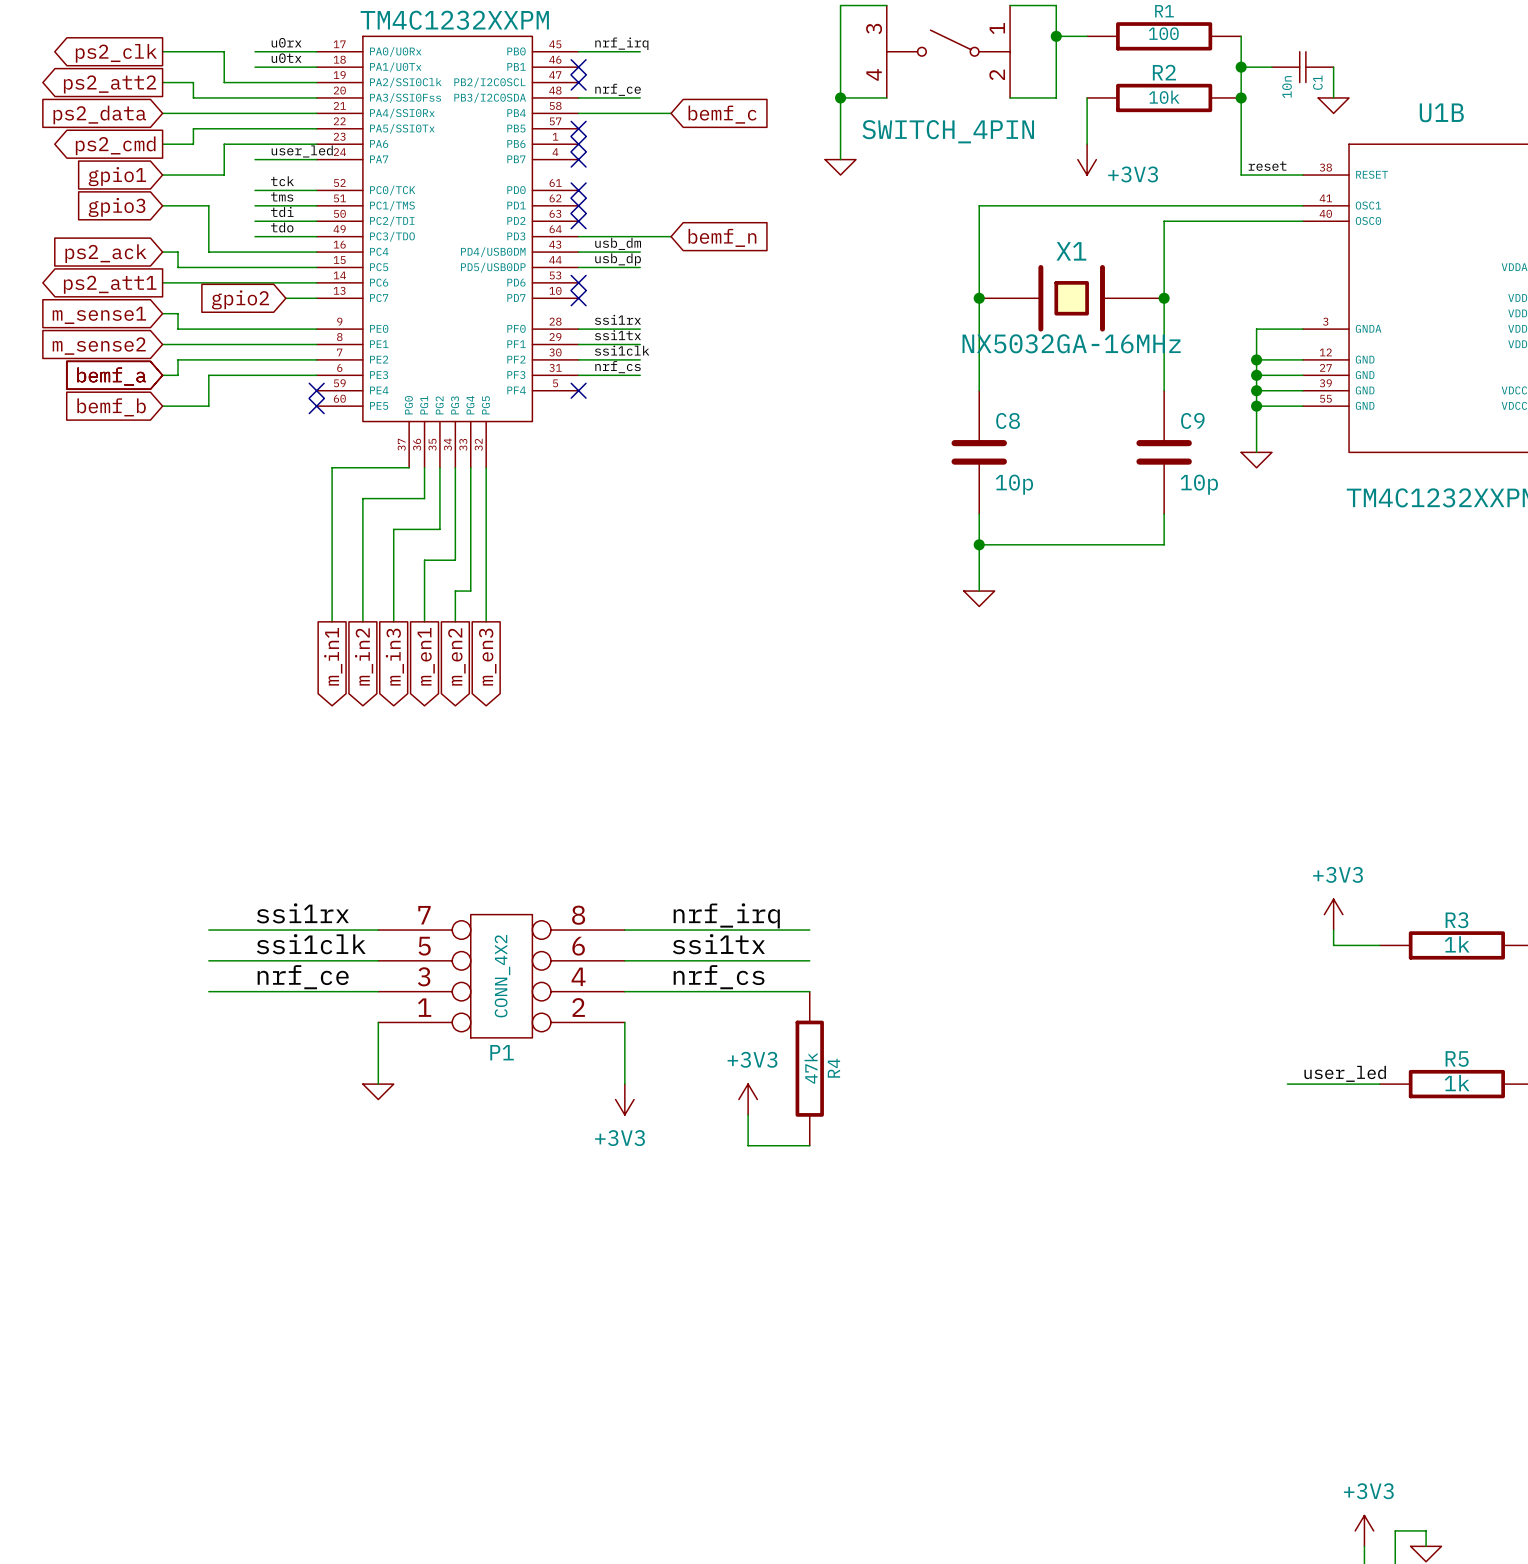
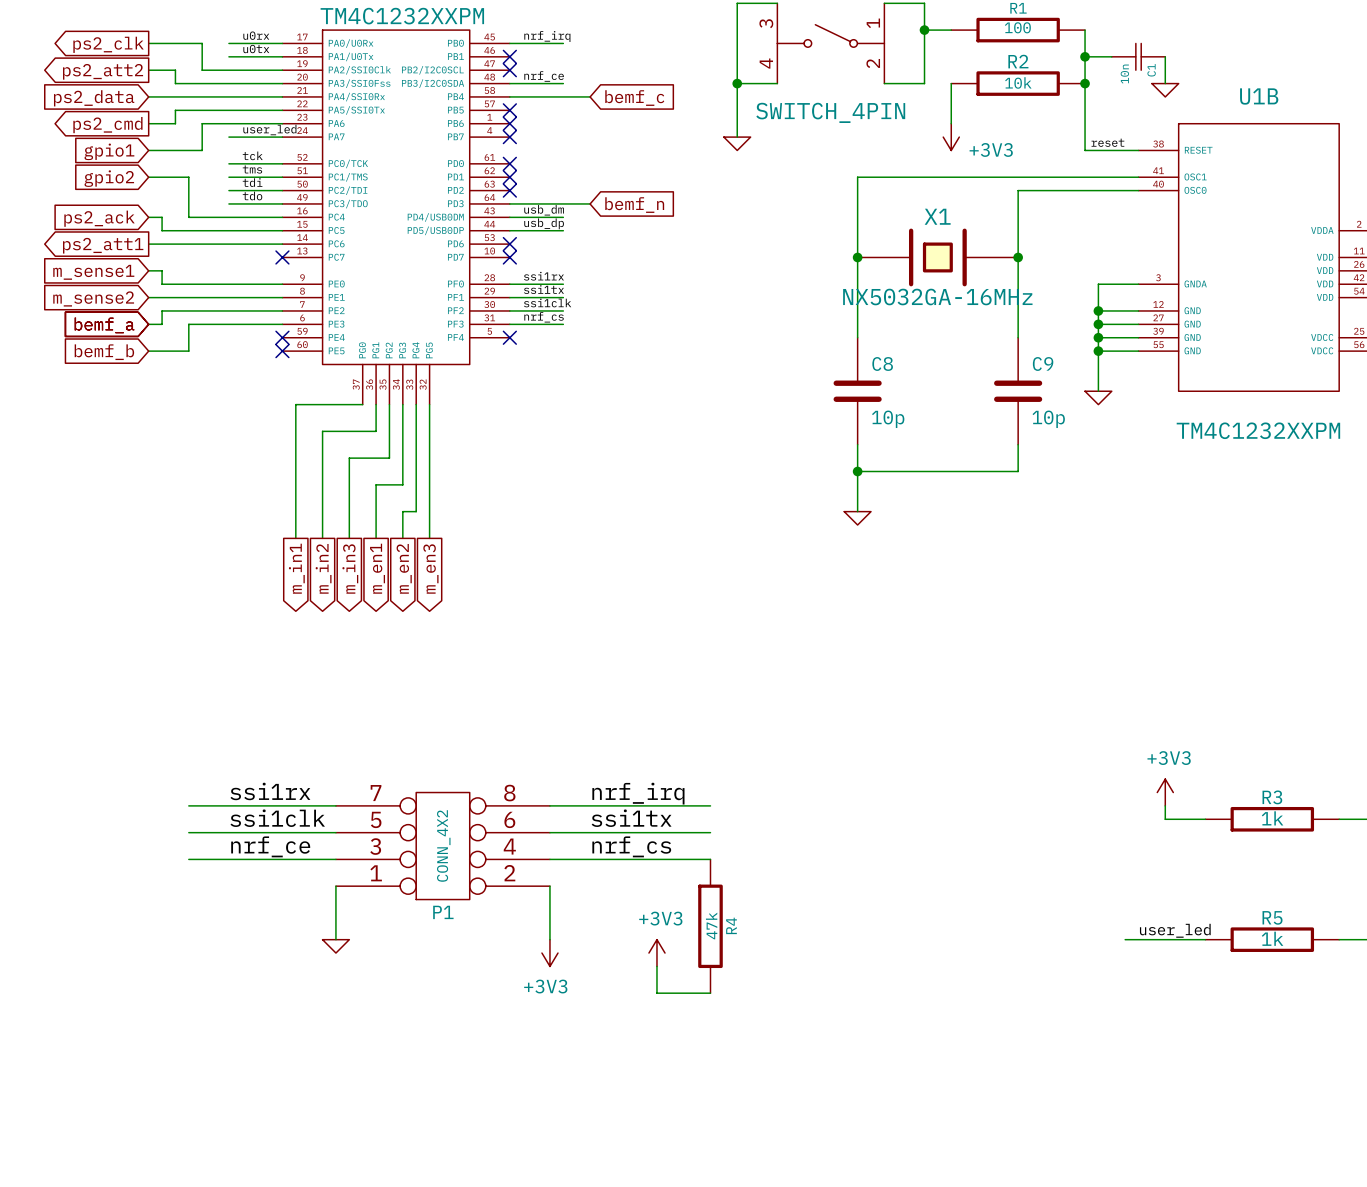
global label: gpio3 (117, 207) -> gpio2 (109, 178)
wire: (285, 298) (316, 298) -> none
no-connect mark: none -> (282, 257)
global label: gpio2 (240, 299) -> none

